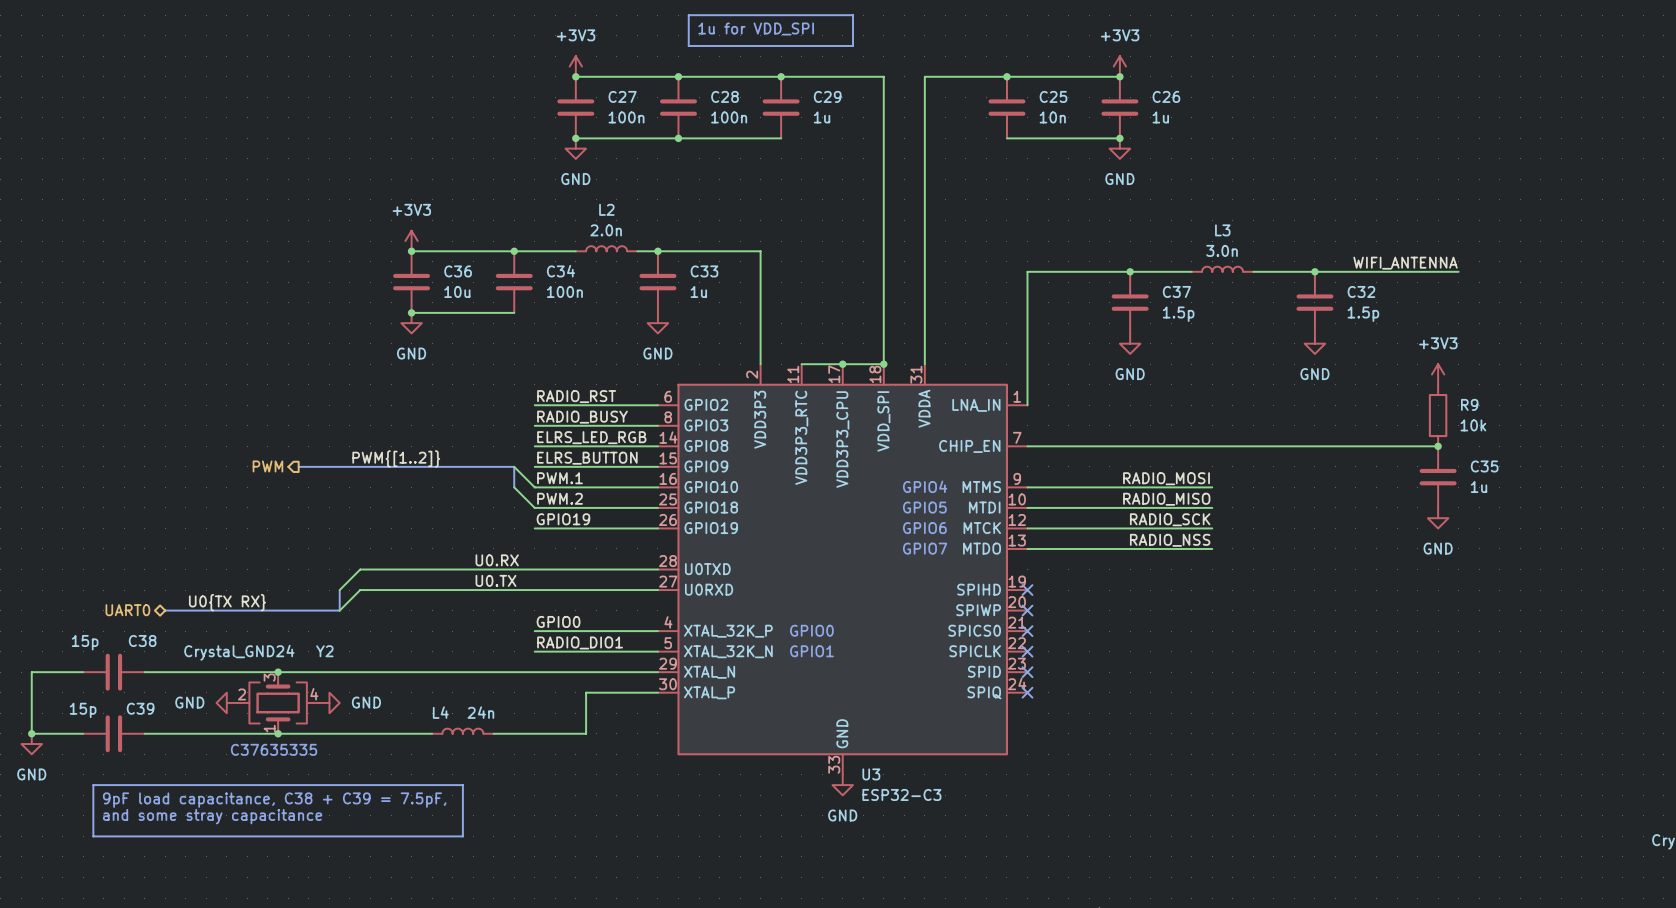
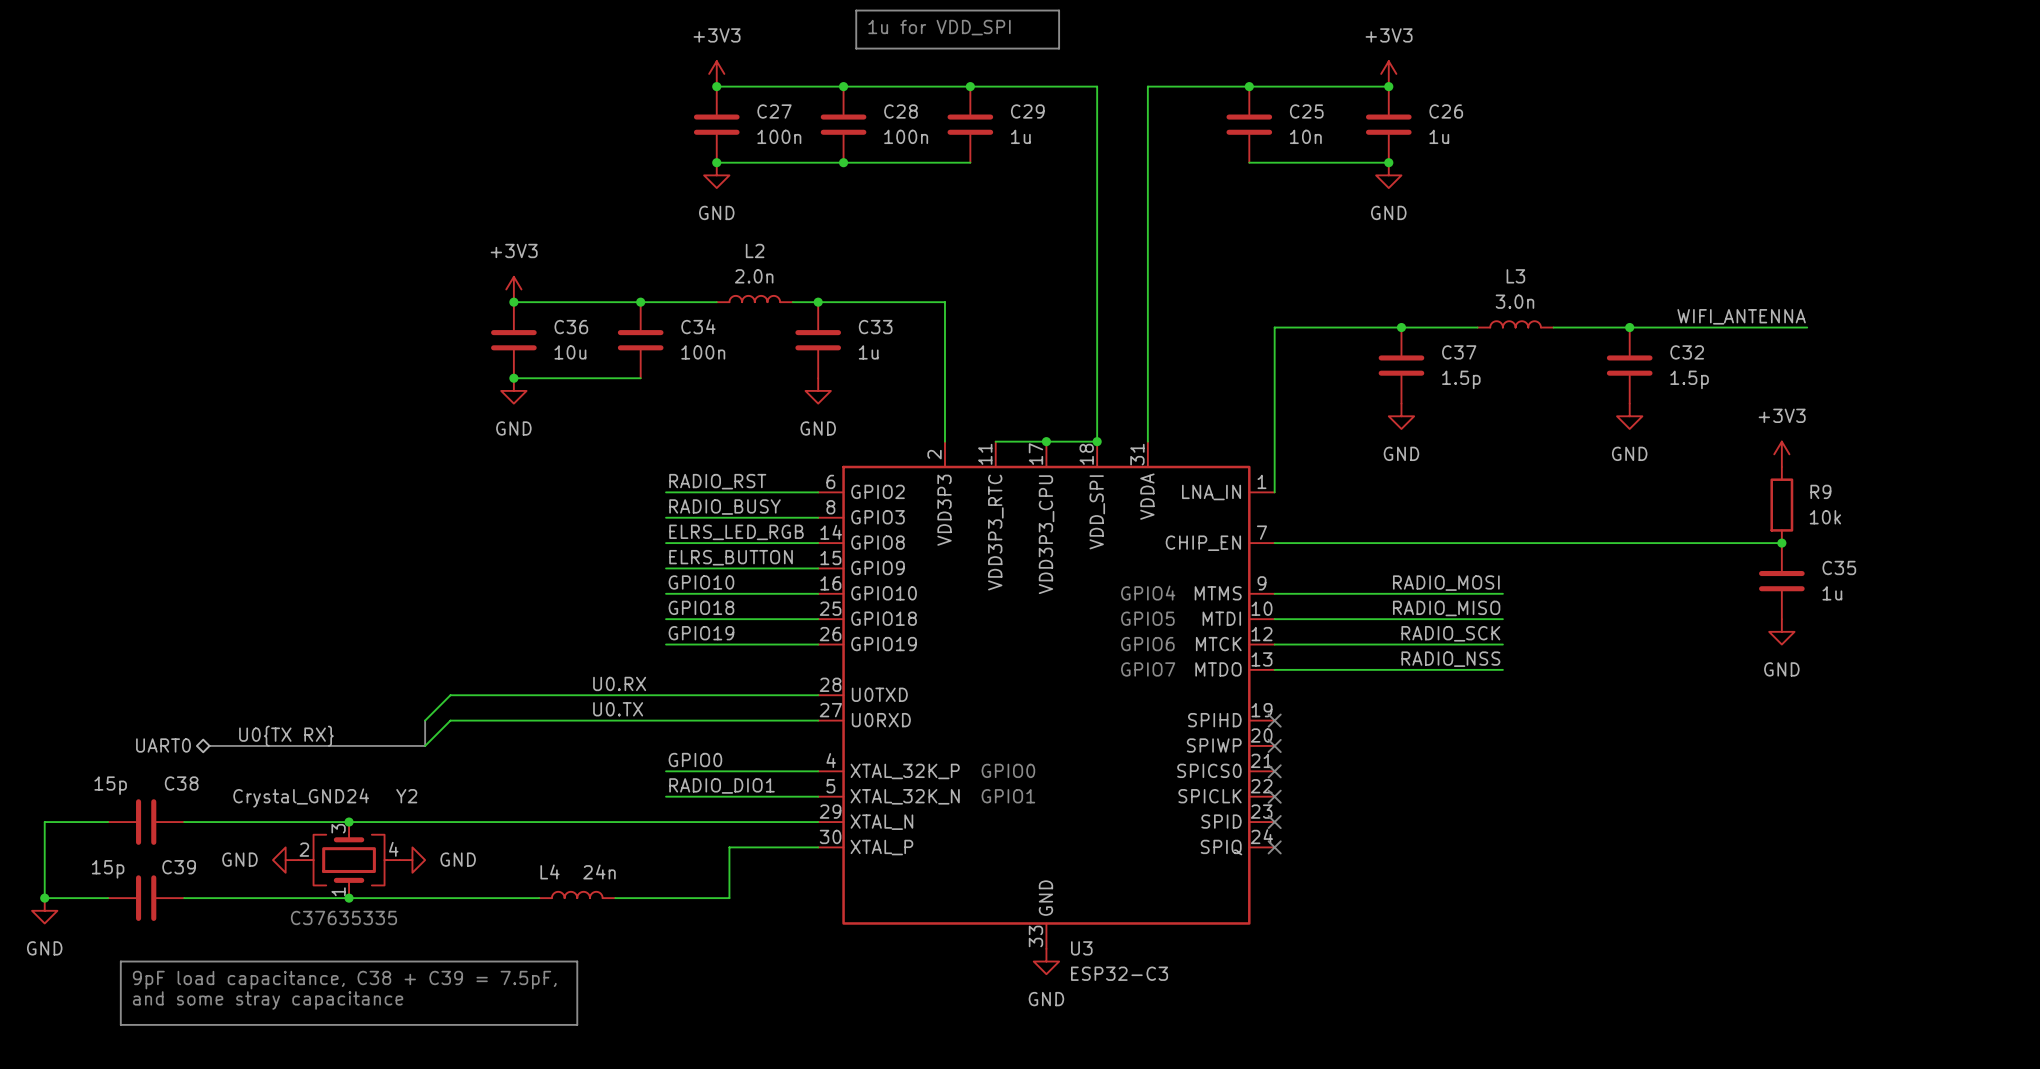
label: PWM{[1..2]} (396, 458) -> none
hierarchical label: PWM (267, 466) -> none
bus: (298, 466) (514, 466) (514, 487) -> none
wire: (514, 466) (534, 487) -> none
label: PWM.1 (560, 478) -> GPIO10 (701, 582)
wire: (514, 487) (534, 507) -> none
label: PWM.2 (560, 498) -> GPIO18 (701, 607)

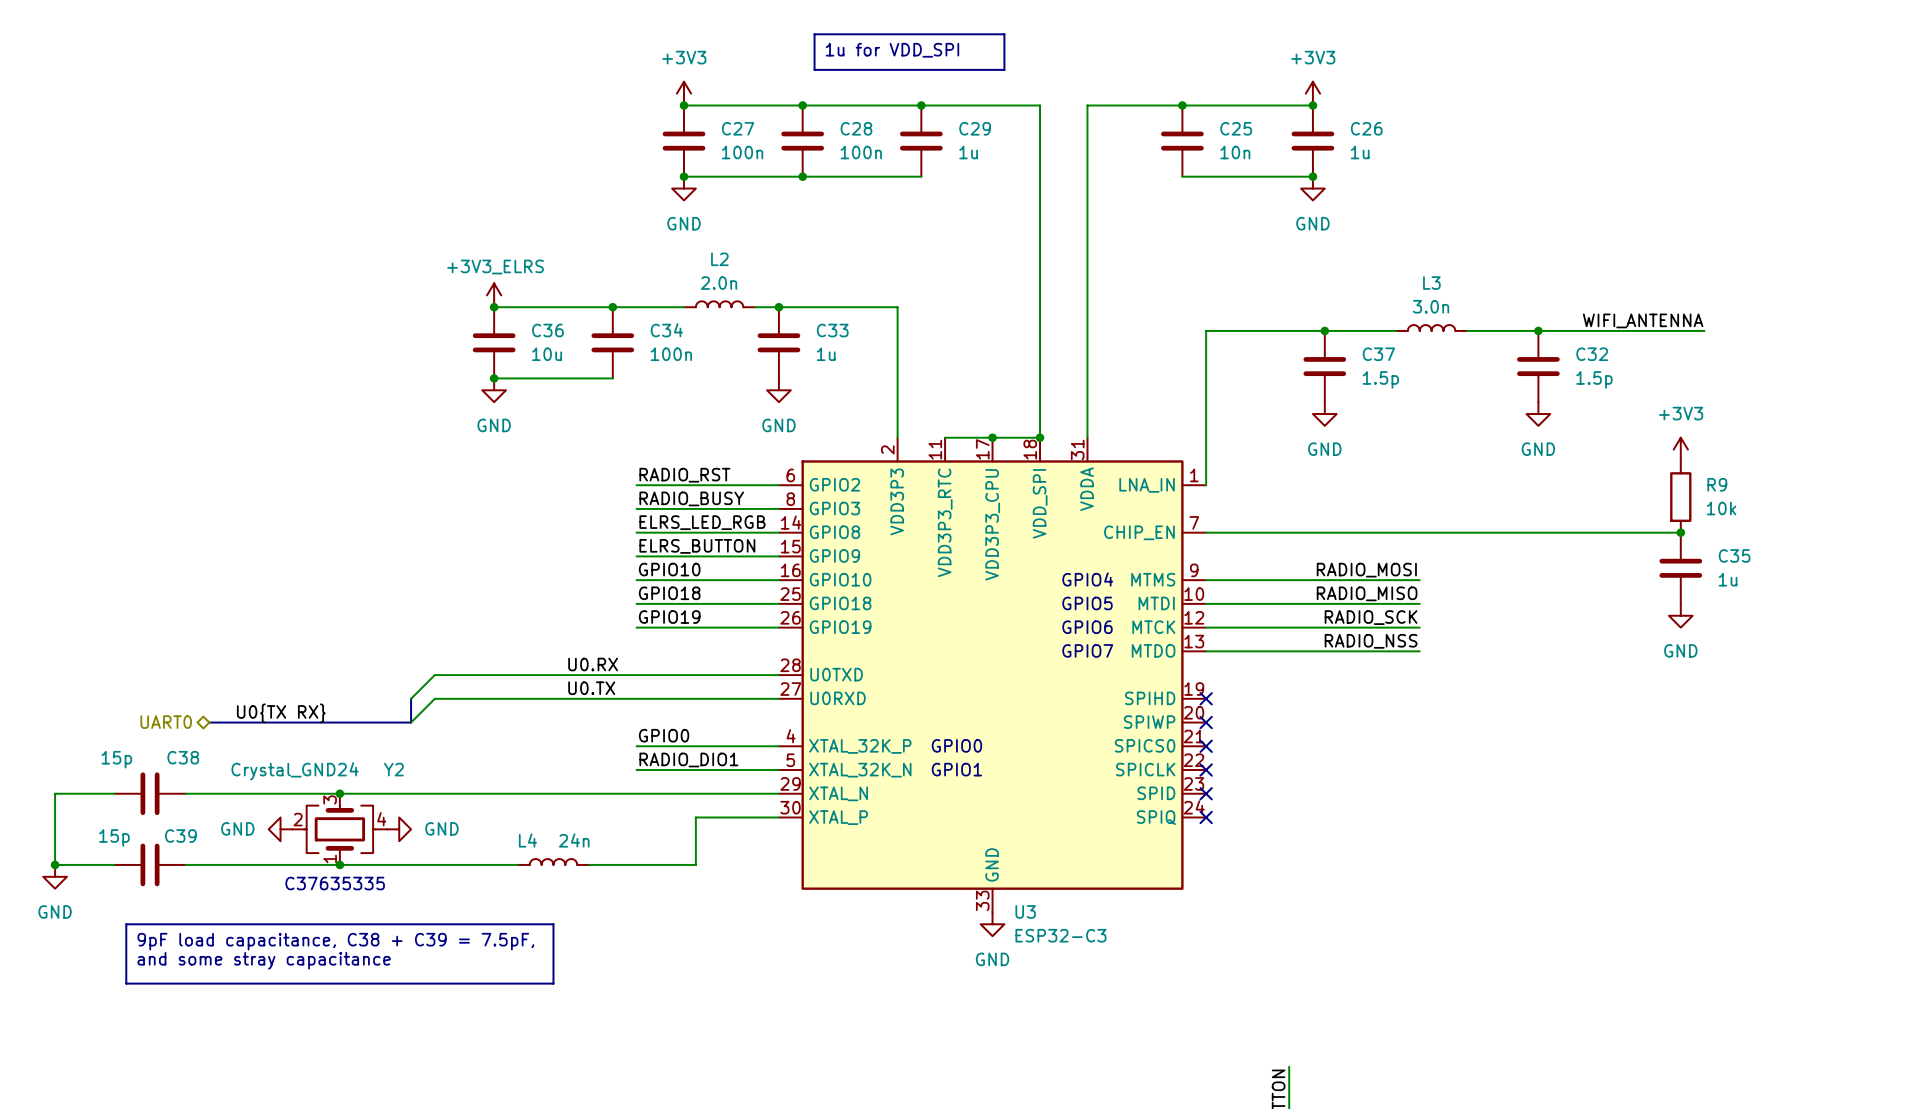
power symbol: +3V3 (513, 289) -> +3V3_ELRS (494, 295)

